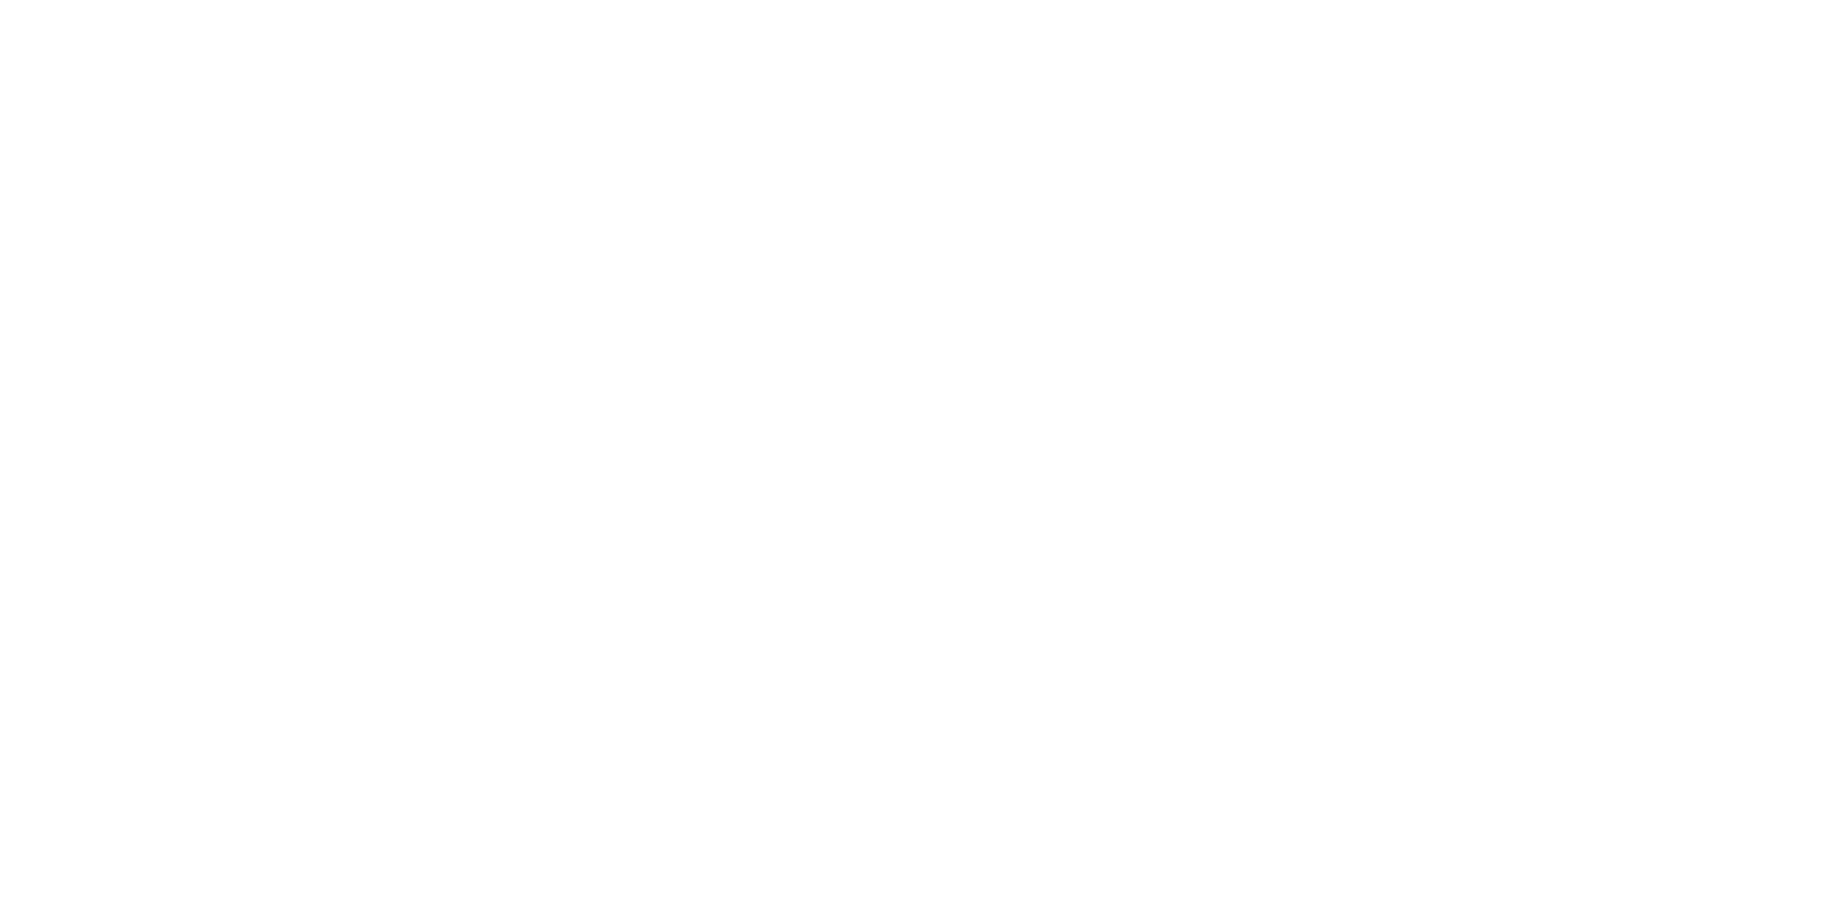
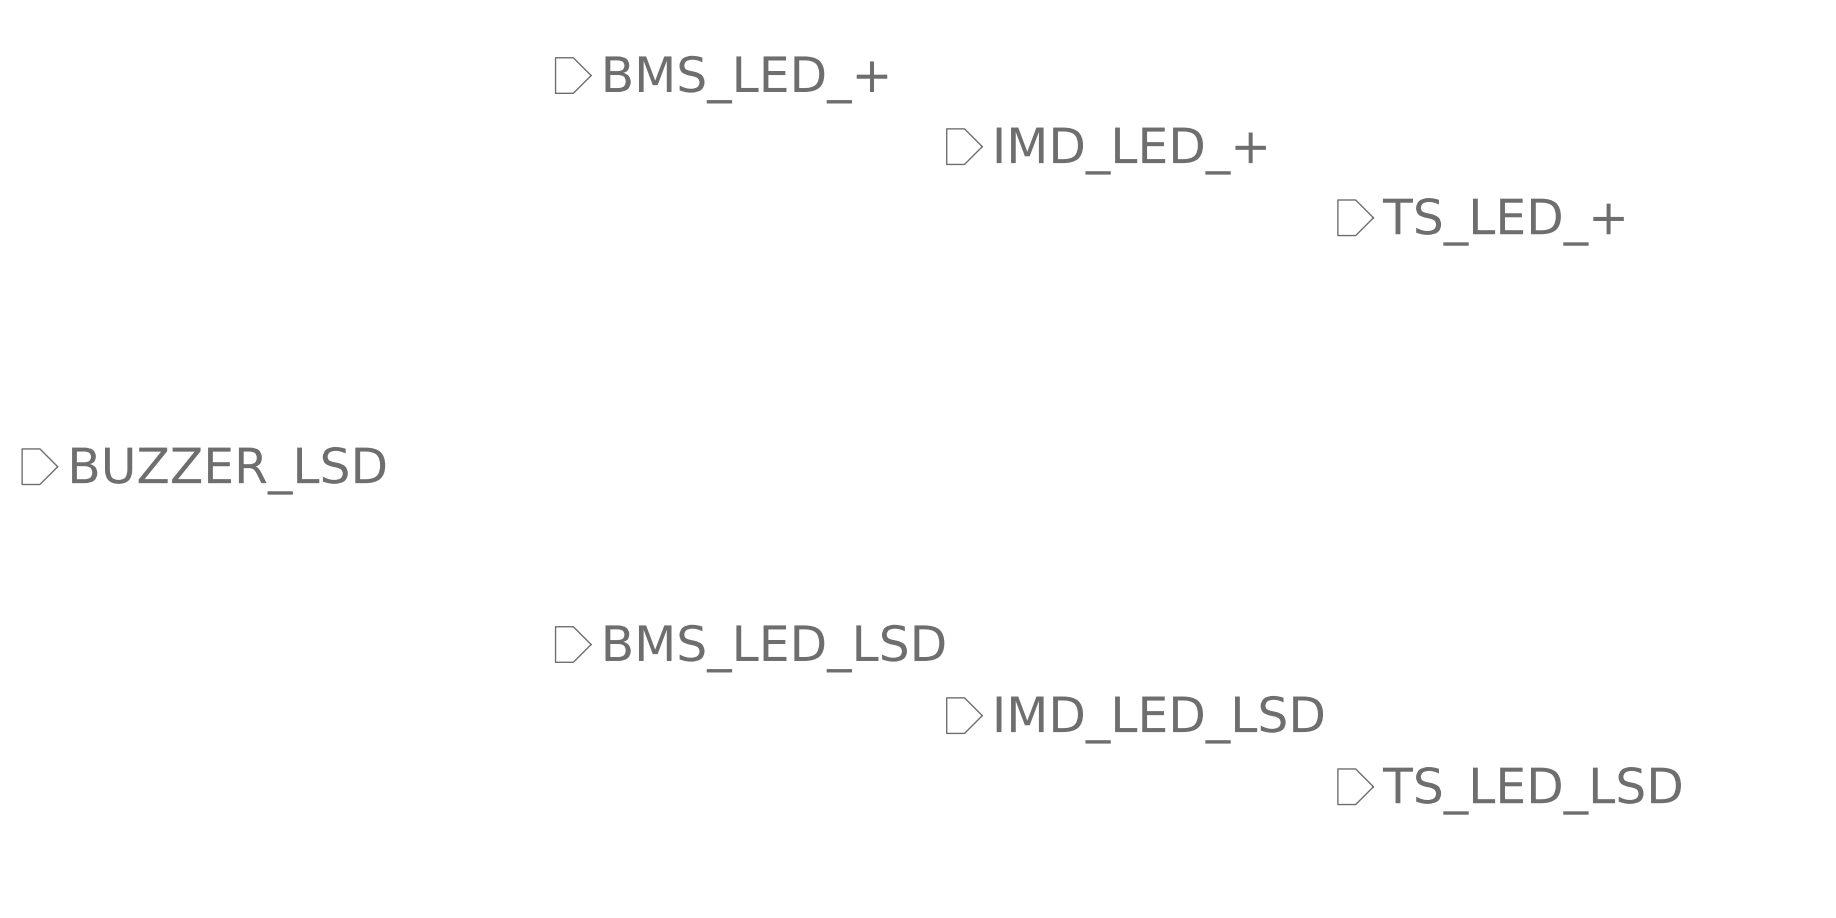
hierarchical label: none -> BMS_LED_+ (746, 79)
hierarchical label: none -> IMD_LED_+ (1131, 151)
hierarchical label: none -> TS_LED_+ (1503, 221)
hierarchical label: none -> BUZZER_LSD (228, 470)
hierarchical label: none -> BMS_LED_LSD (774, 648)
hierarchical label: none -> IMD_LED_LSD (1159, 719)
hierarchical label: none -> TS_LED_LSD (1531, 790)

